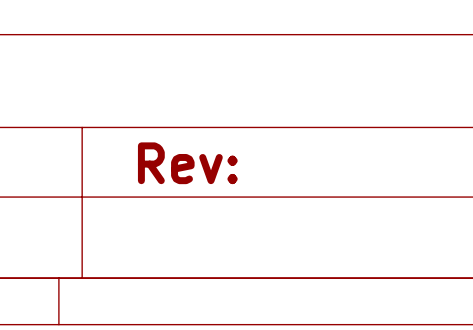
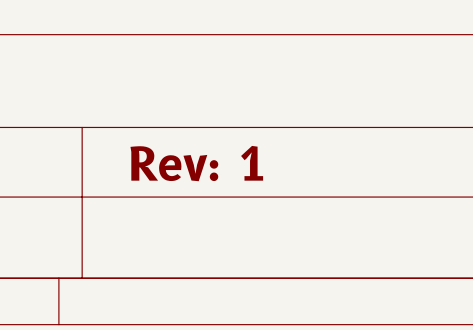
title block: Rev: (187, 163) -> Rev: 1 (196, 163)

